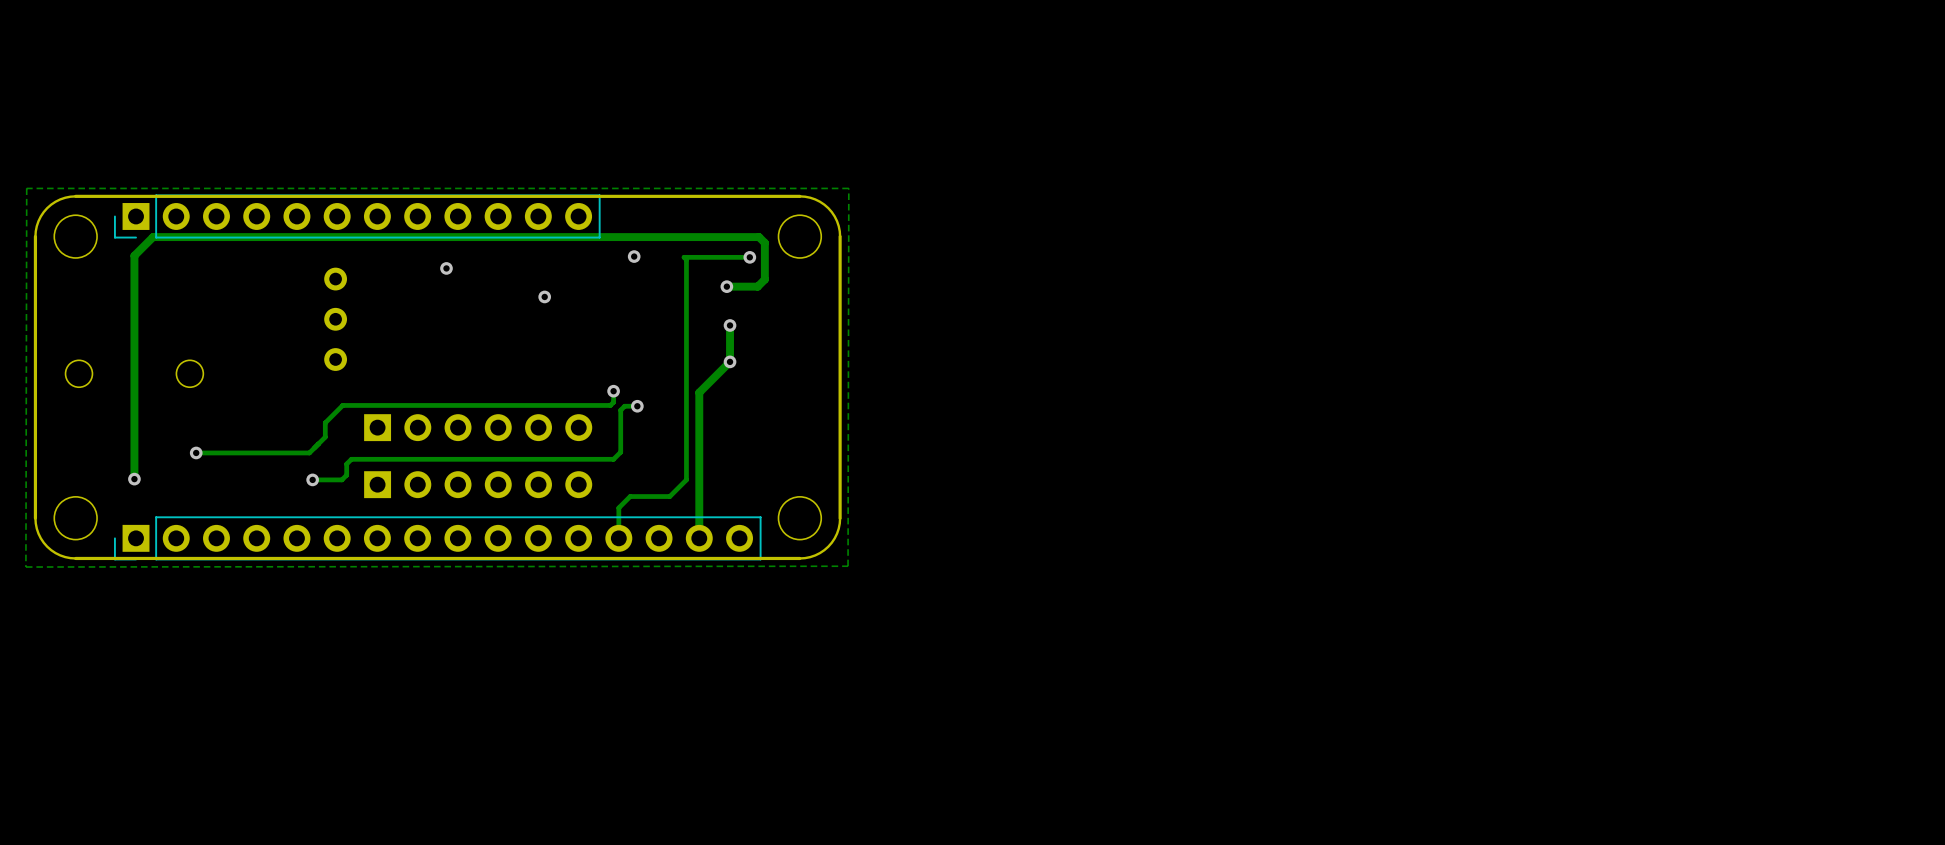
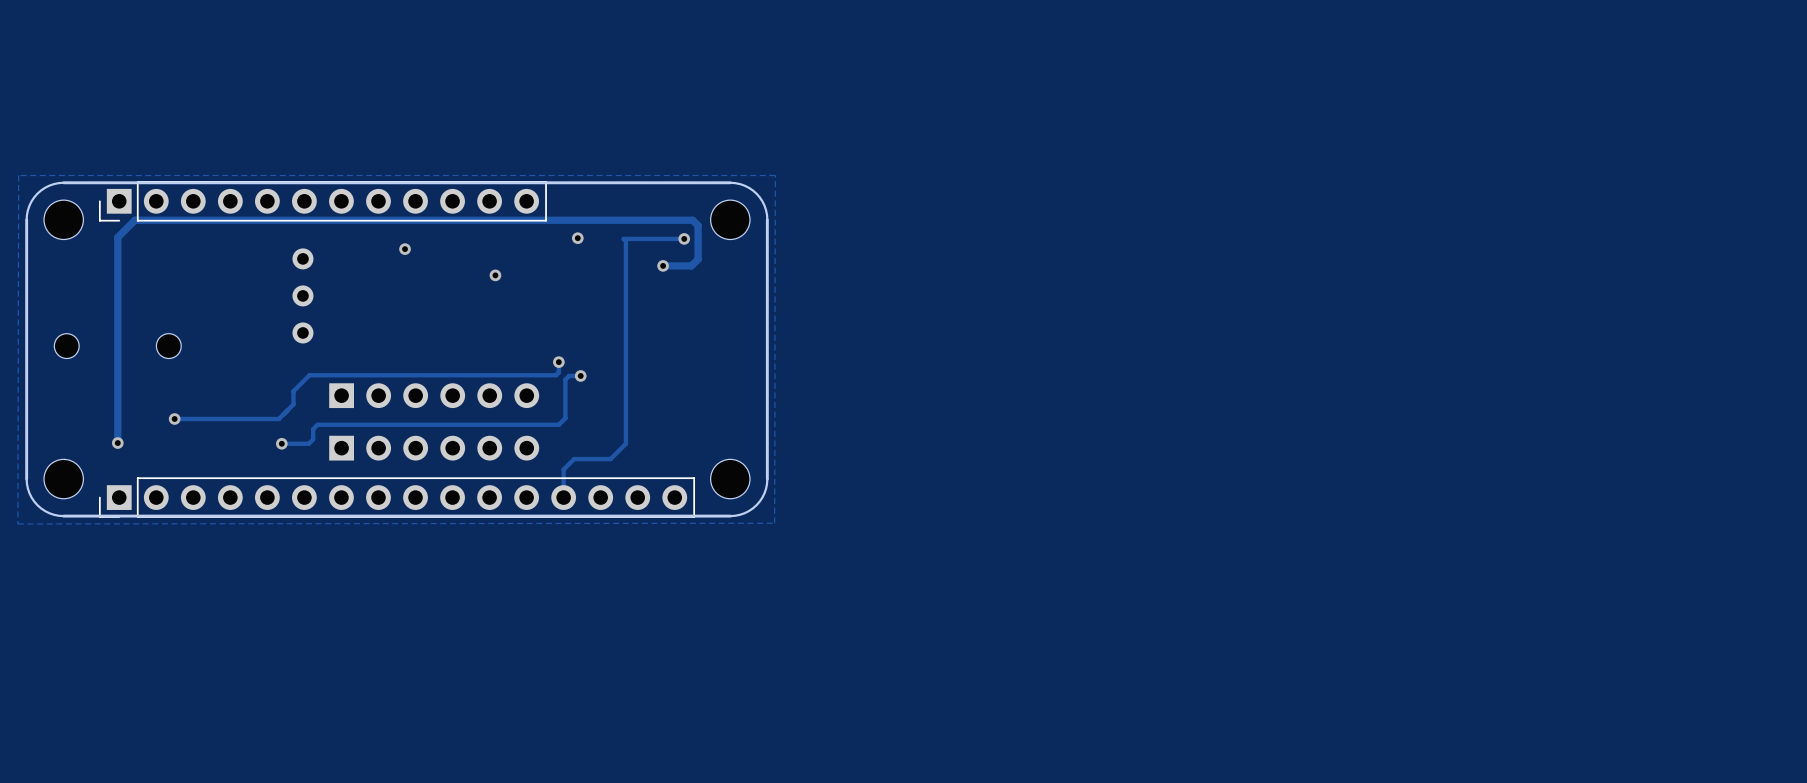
track: (730, 325) (730, 361) -> none
via: (730, 325) -> none
track: (730, 361) (699, 392) -> none
via: (730, 361) -> none
track: (699, 392) (699, 538) (699, 392) -> none

